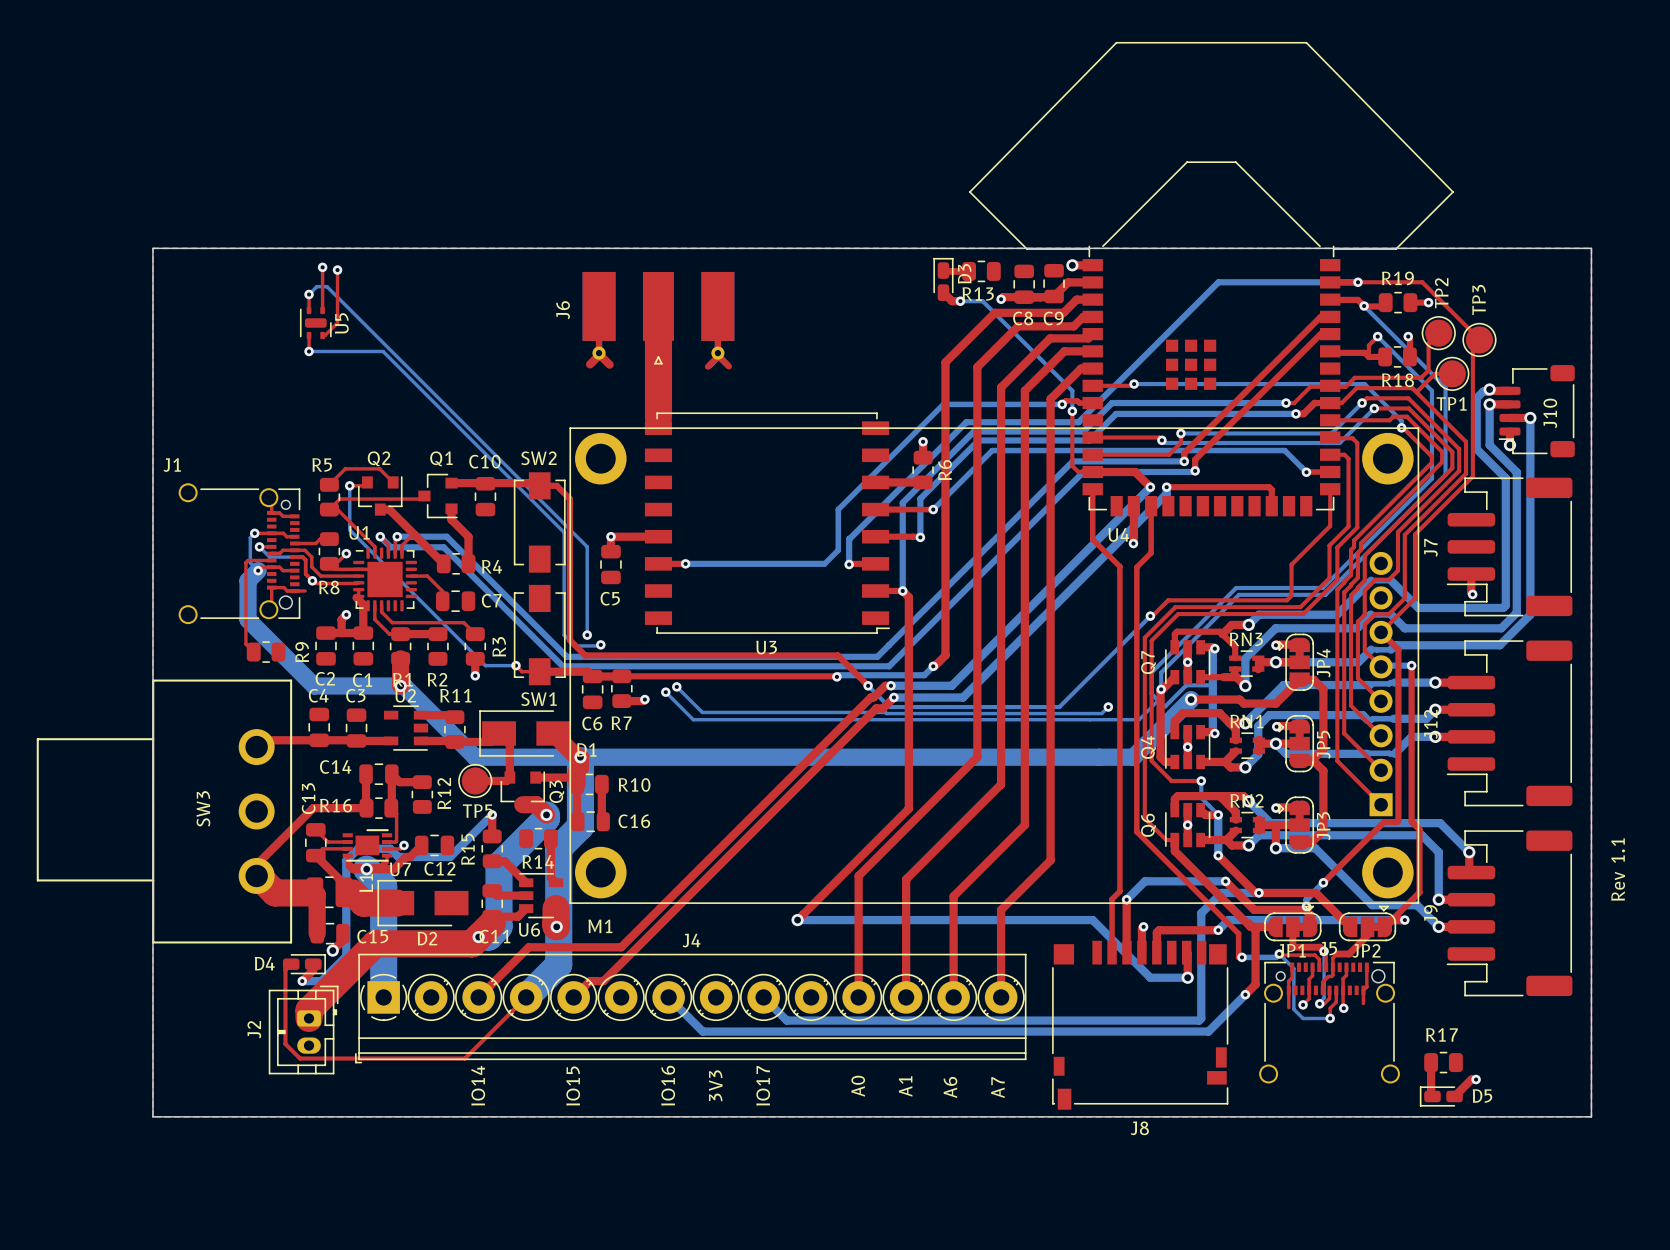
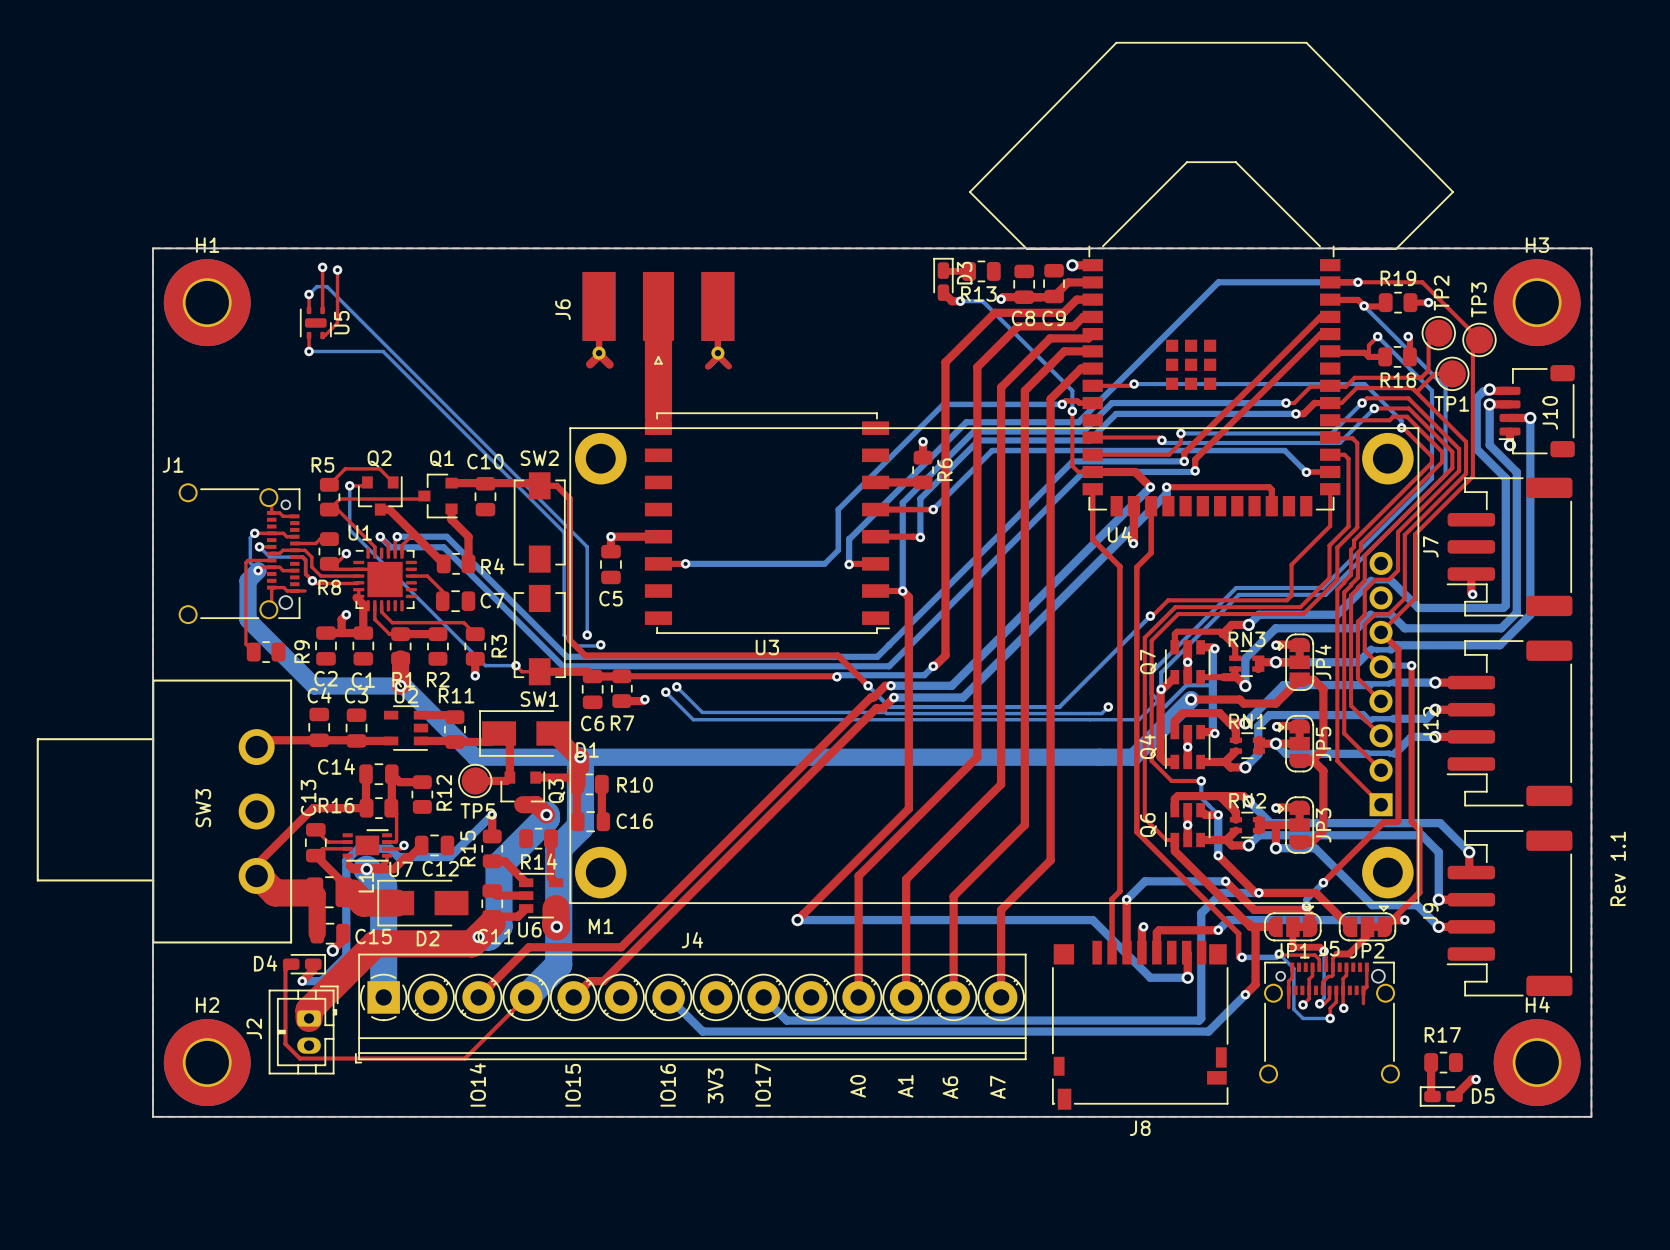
H1: none -> (207, 302)
H3: none -> (1537, 302)
H2: none -> (207, 1062)
H4: none -> (1537, 1062)

